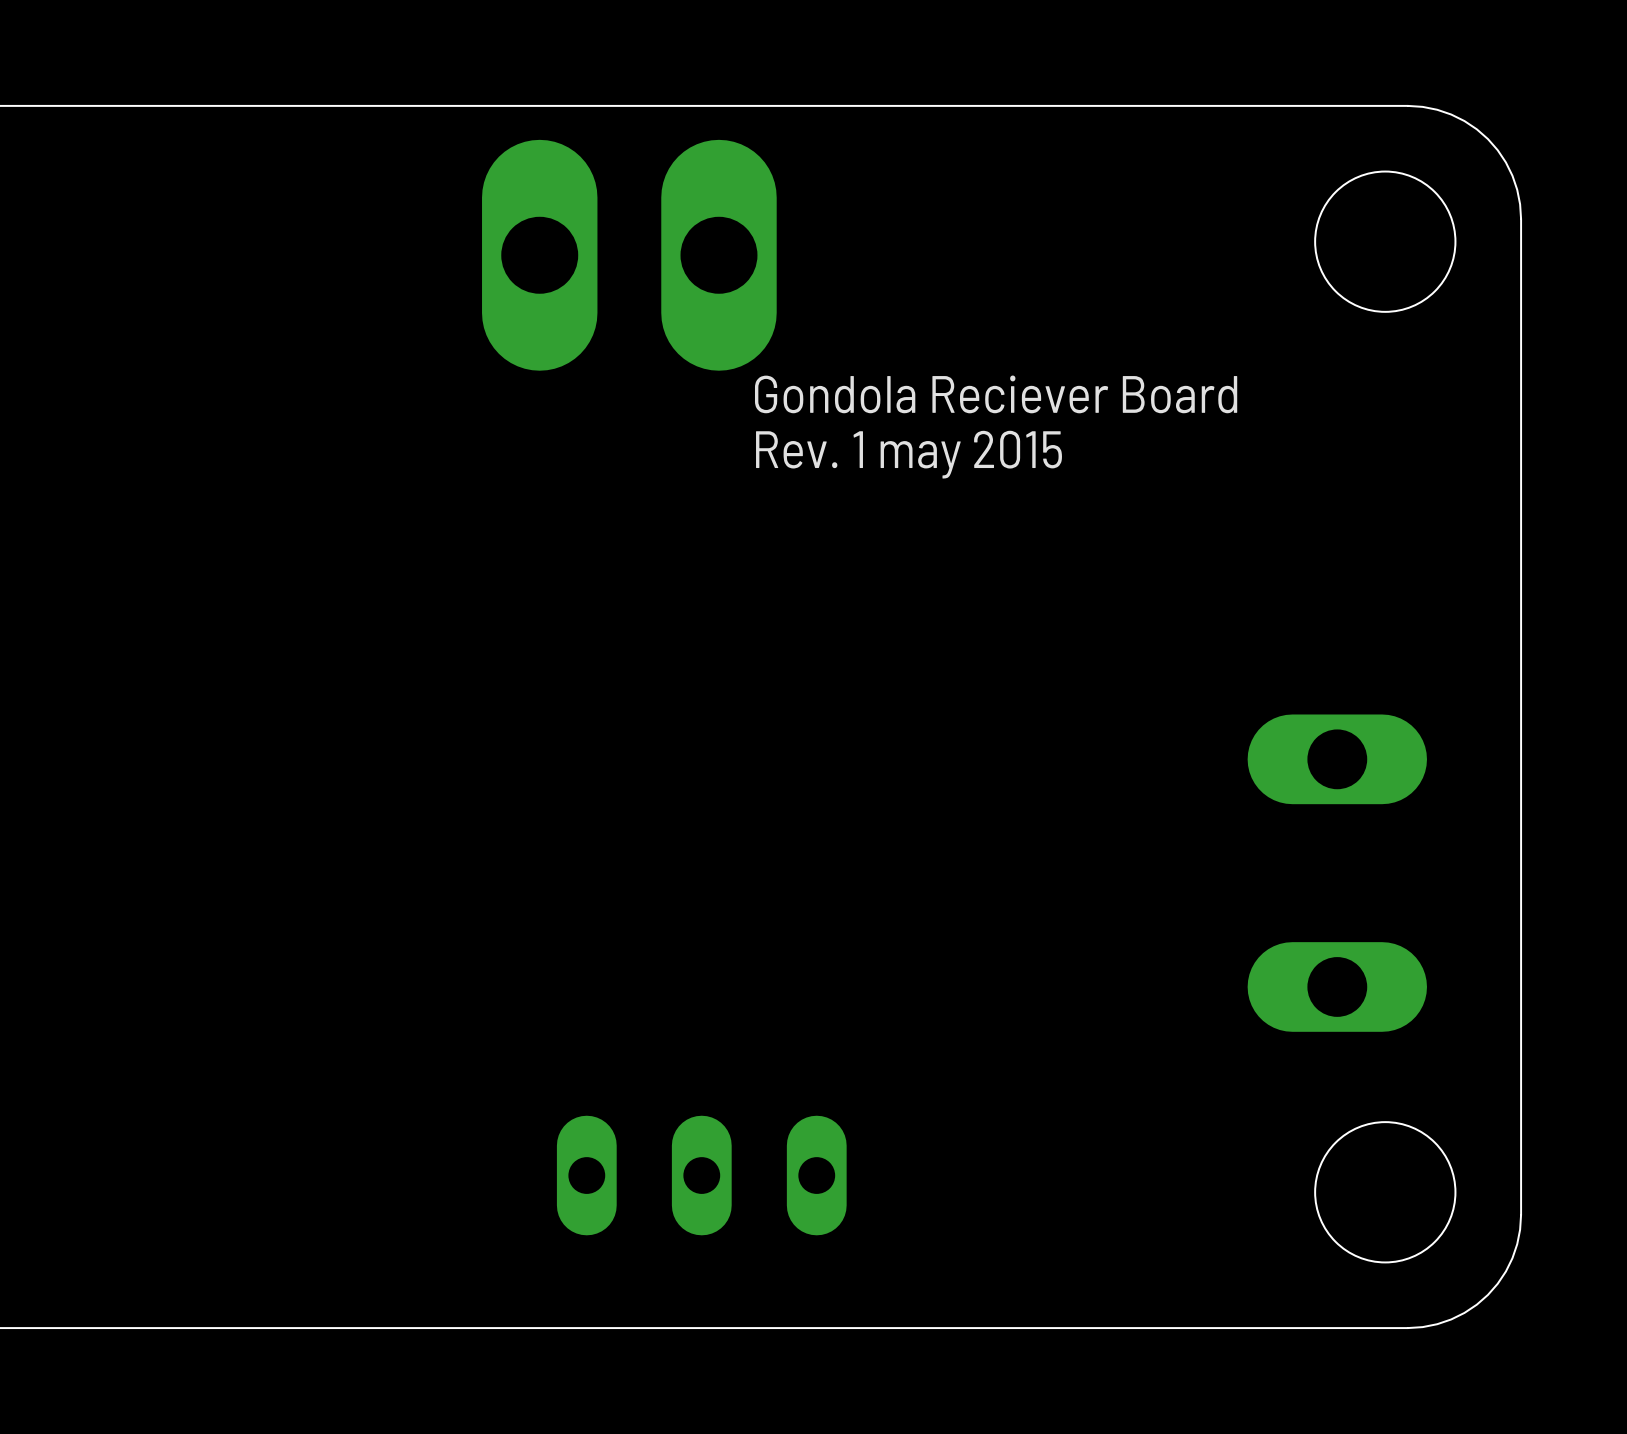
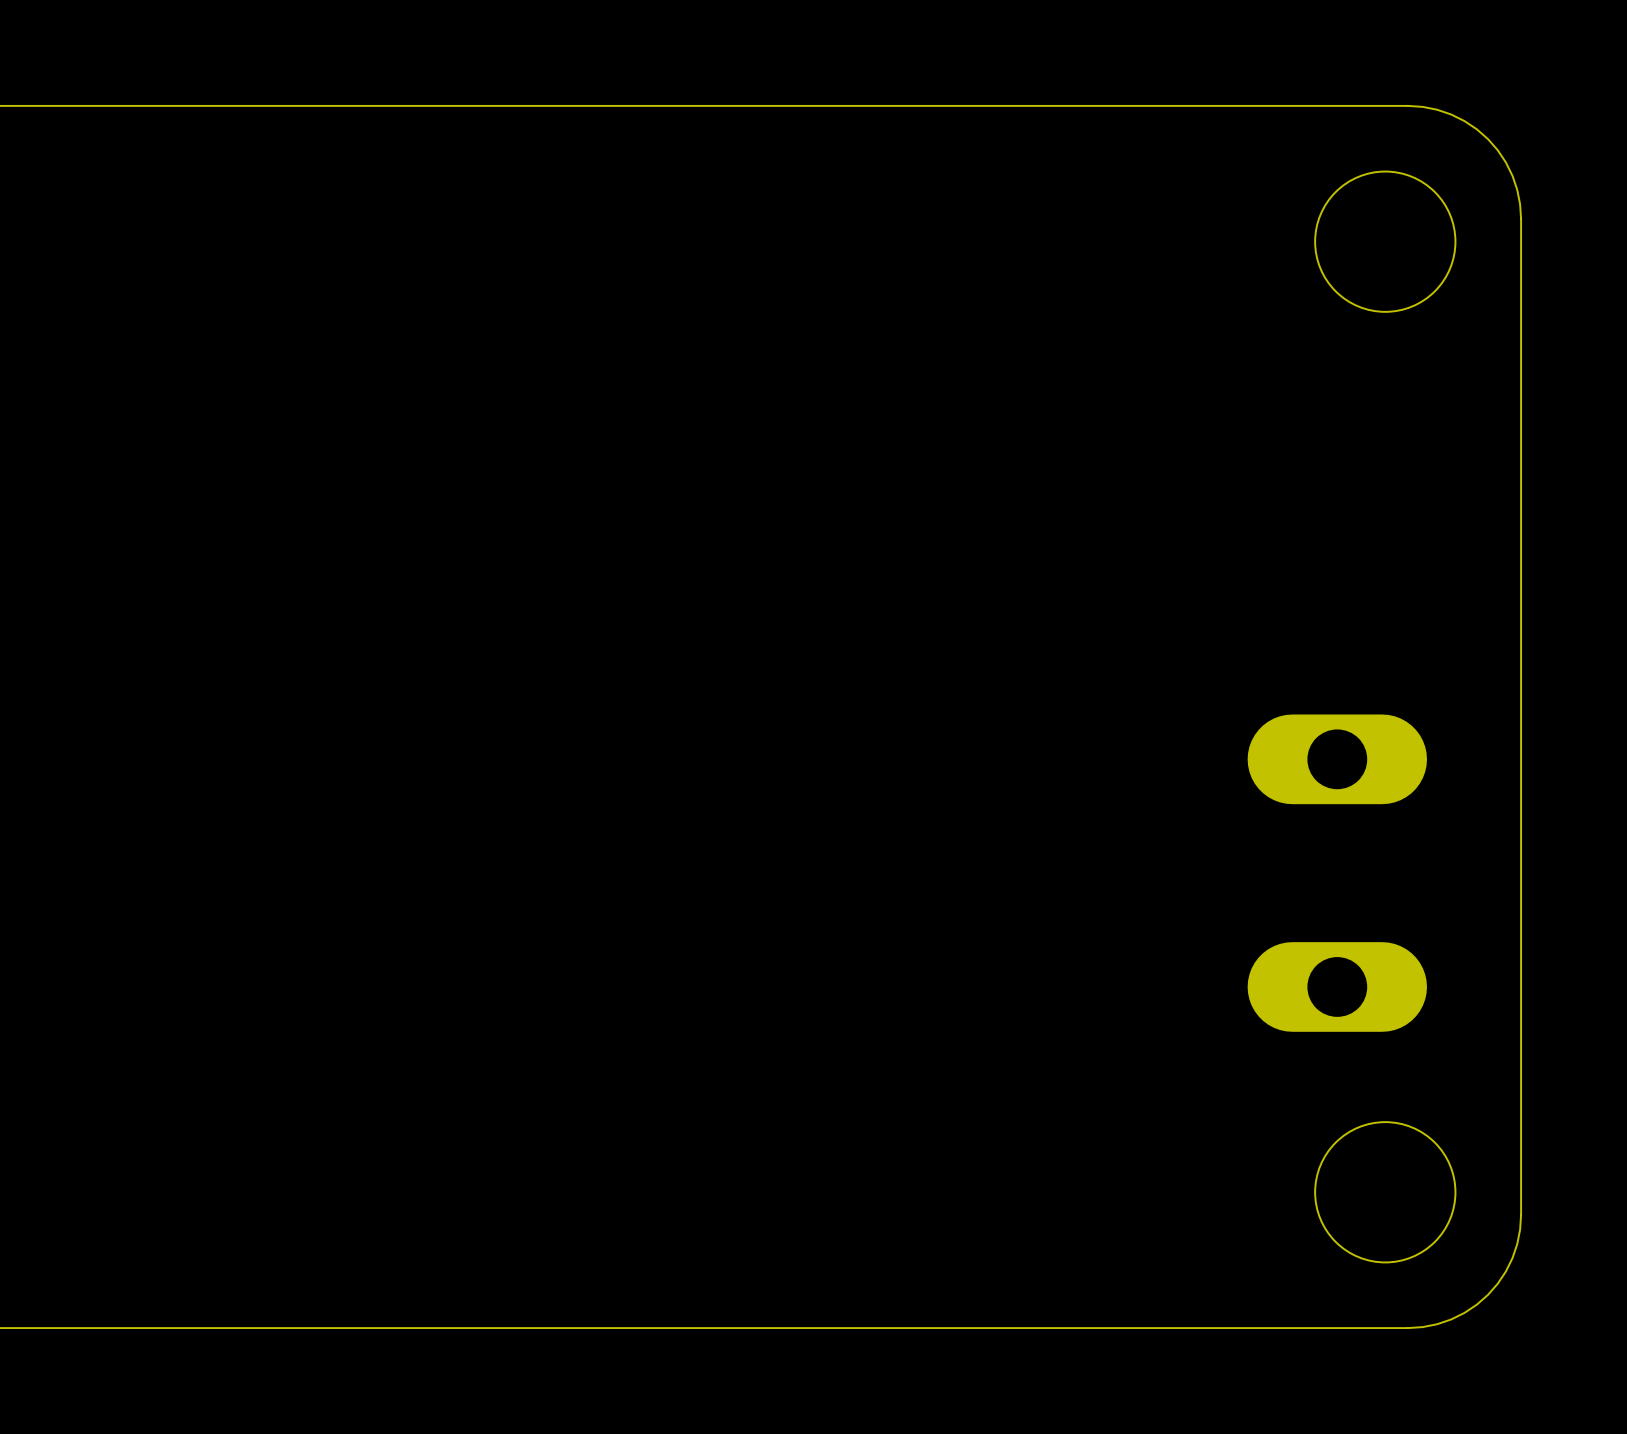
part: (629, 255) -> none
text: Gondola Reciever Board (996, 394) -> none
text: Rev. 1 may 2015 (909, 454) -> none
part: (701, 1175) -> none

